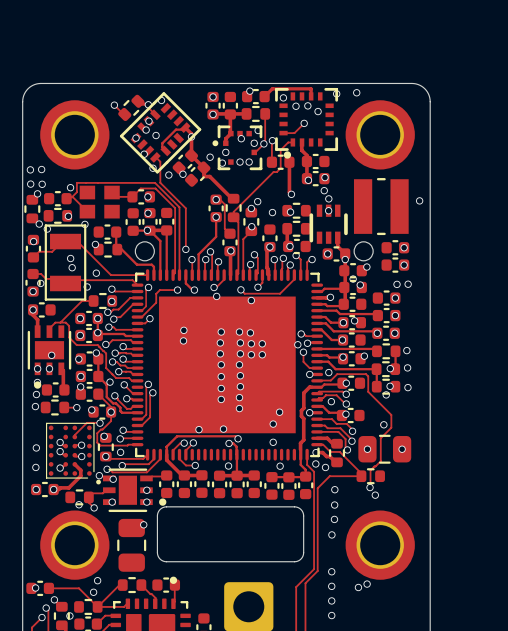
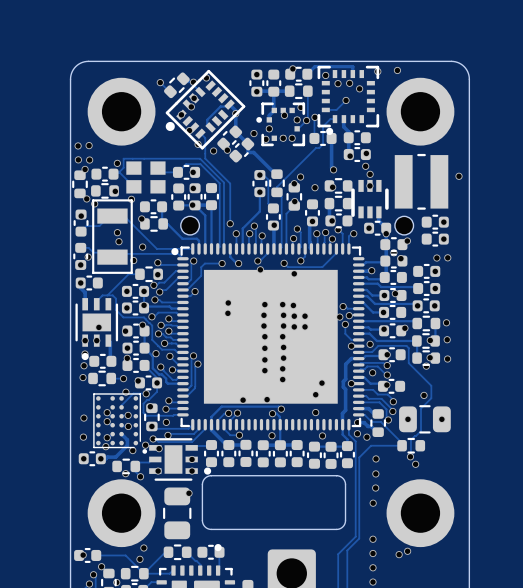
part footprint: [119, 92, 202, 174] -> [165, 69, 246, 150]
via: (156, 135) -> none
part footprint: [131, 269, 324, 461] -> [171, 243, 365, 431]
via: none -> (125, 392)
via: none -> (105, 446)
via: none -> (132, 450)

